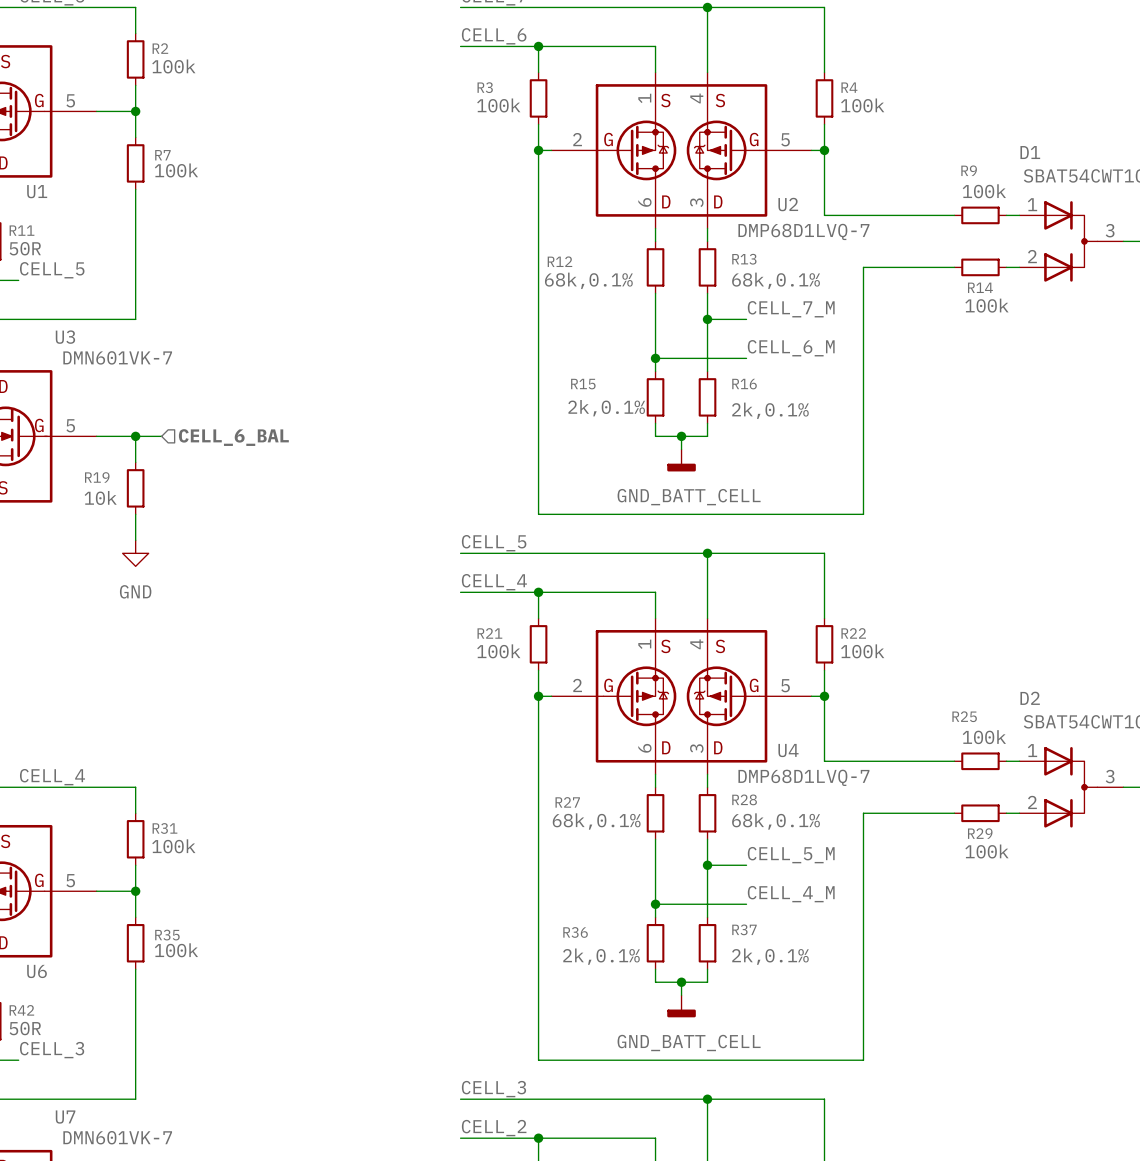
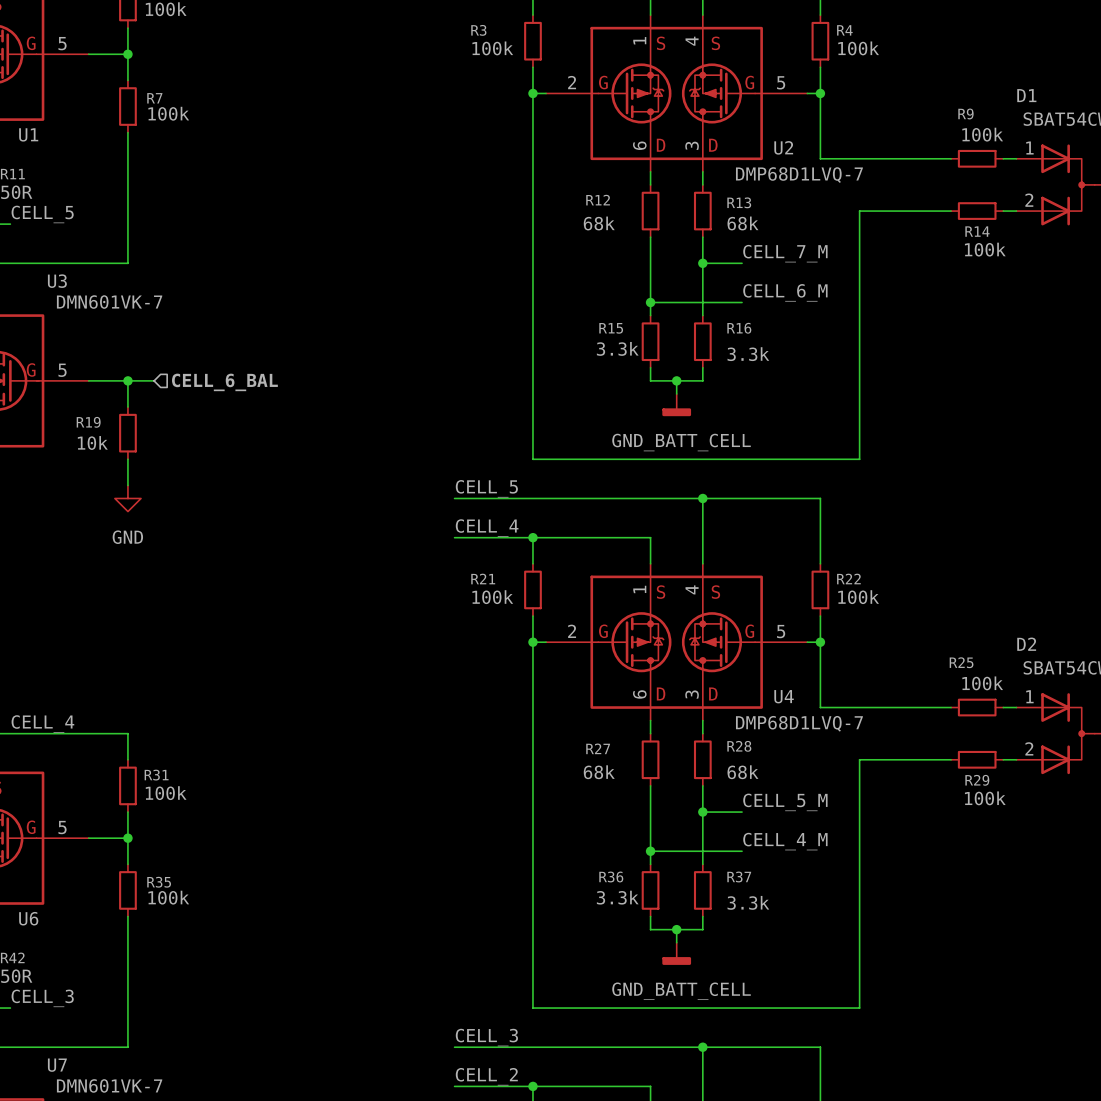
R12 name position: R12 (559, 261) -> R12 (598, 200)
R12 value: 68k,0.1% (588, 280) -> 68k (599, 223)
R13 value: 68k,0.1% (776, 280) -> 68k (742, 223)
R15 name position: R15 (583, 384) -> R15 (611, 328)
R15 value: 2k,0.1% (606, 408) -> 3.3k (617, 348)
R16 value: 2k,0.1% (770, 410) -> 3.3k (748, 354)
R27 name position: R27 (567, 802) -> R27 (598, 748)
R27 value: 68k,0.1% (596, 821) -> 68k (599, 772)
R28 value: 68k,0.1% (776, 821) -> 68k (742, 772)
R36 name position: R36 (575, 932) -> R36 (611, 876)
R36 value: 2k,0.1% (601, 956) -> 3.3k (617, 897)
R37 value: 2k,0.1% (770, 956) -> 3.3k (748, 902)

